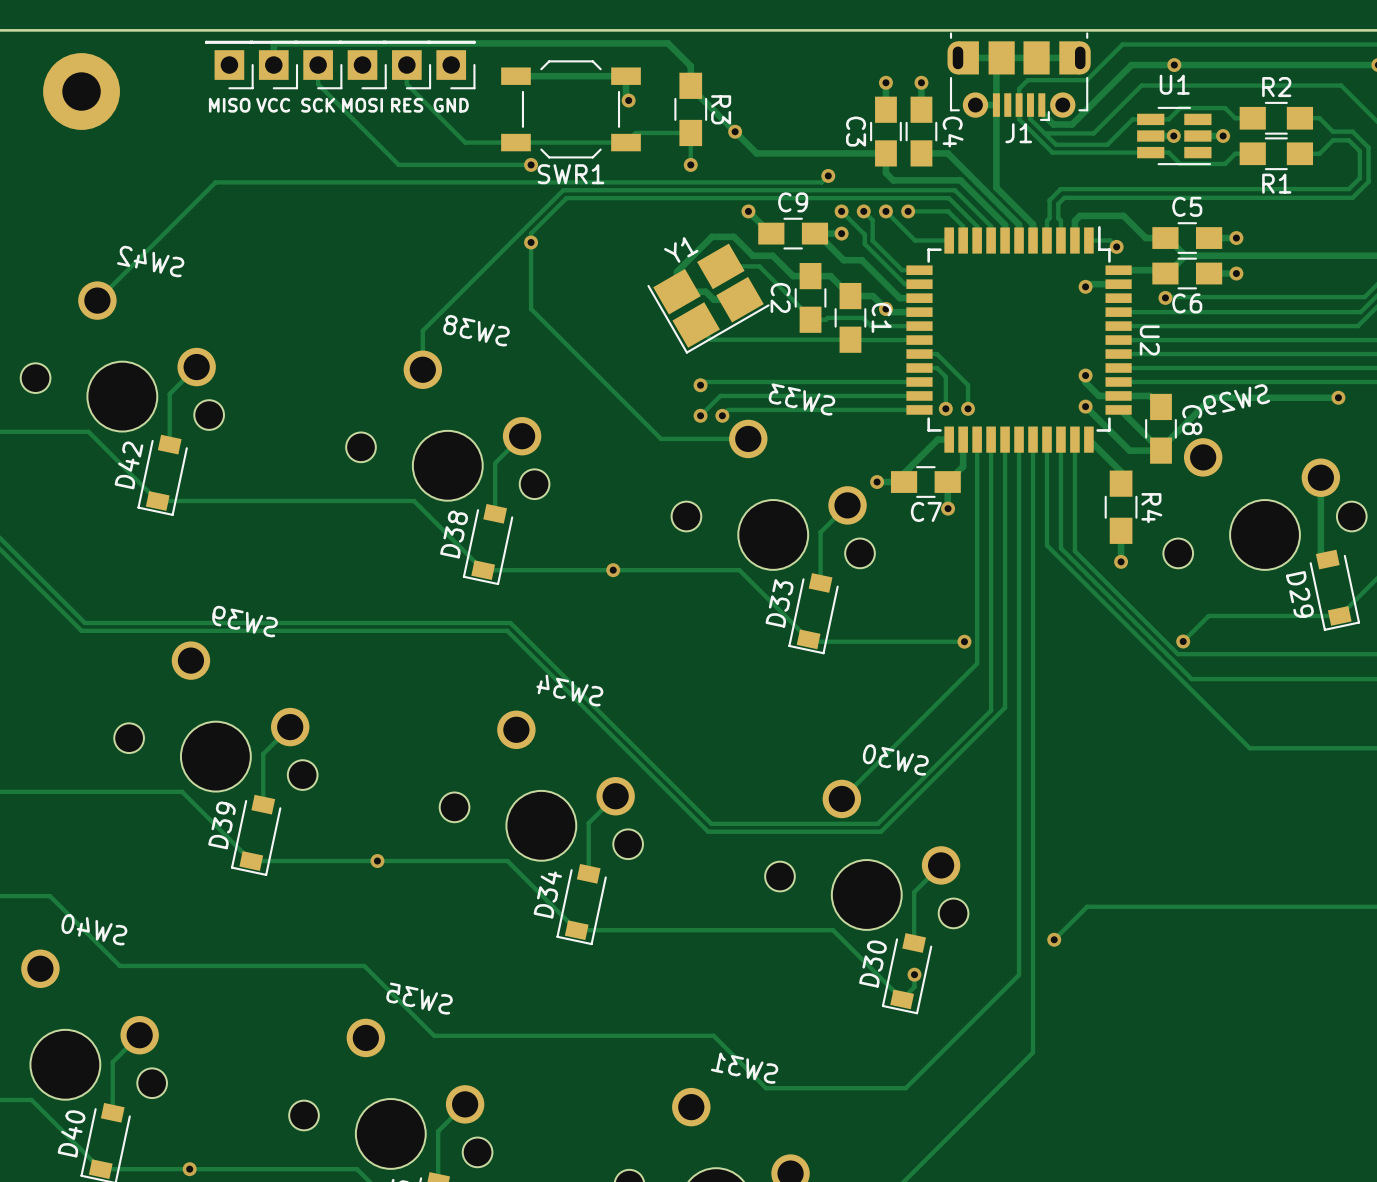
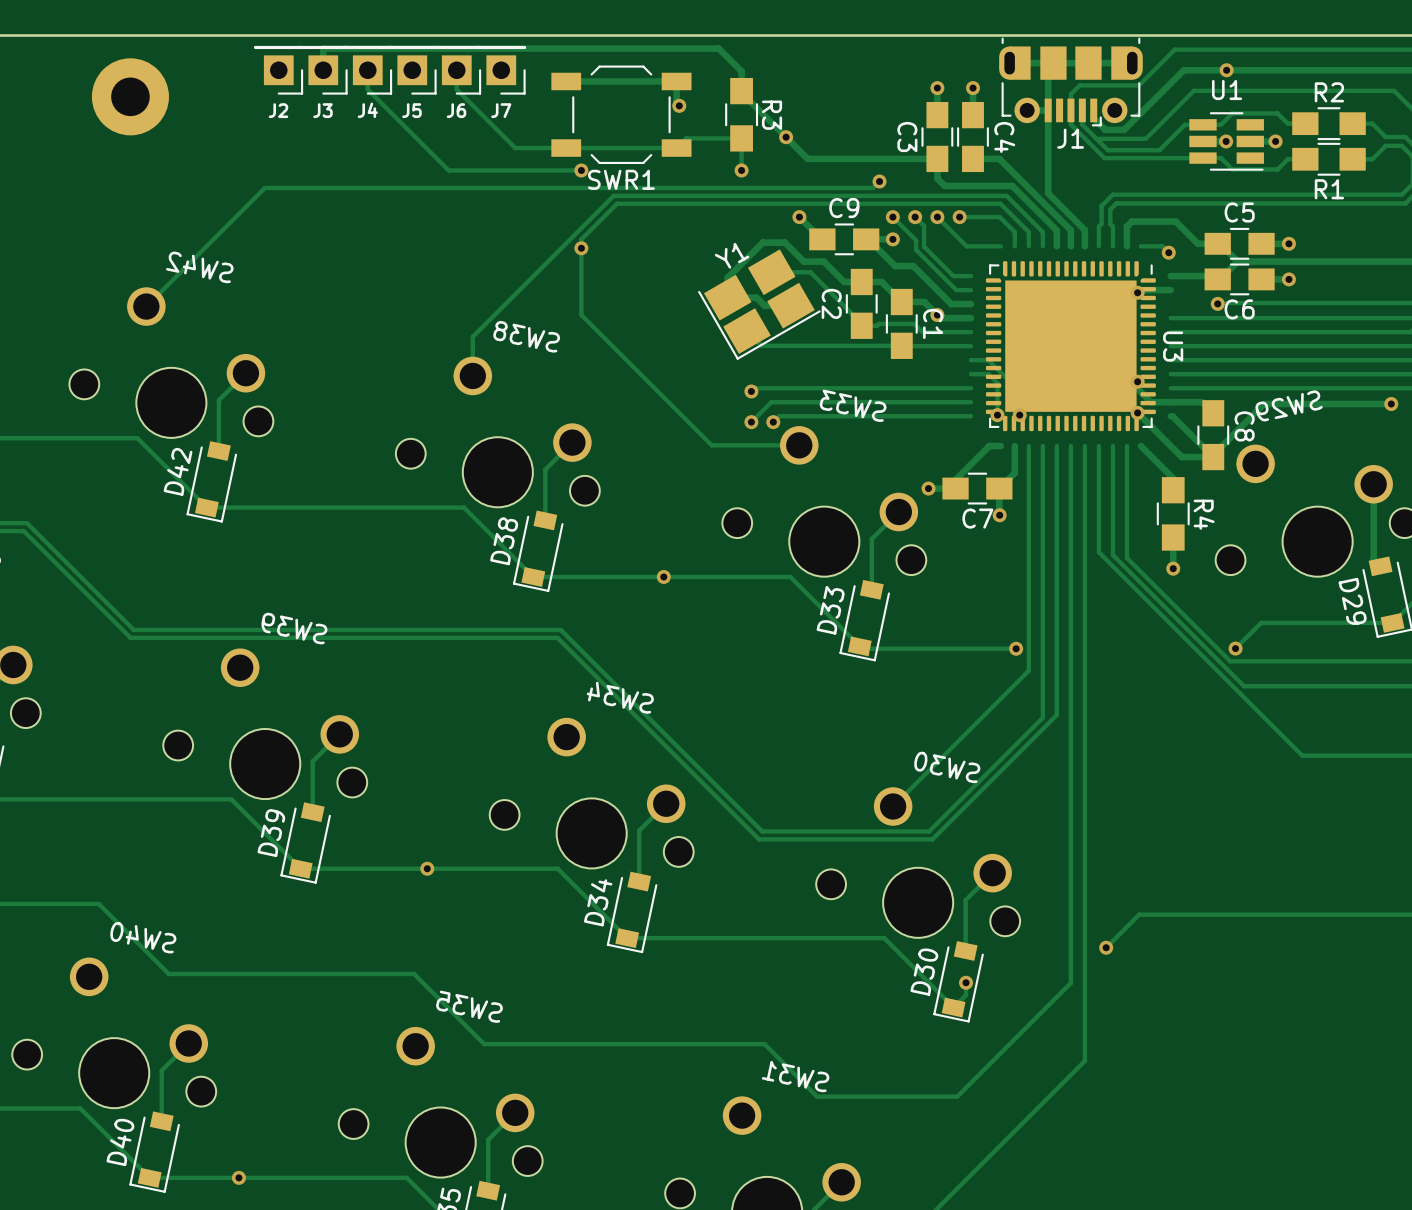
MISO name: MISO (229, 105) -> J2 (278, 110)
VCC name: VCC (273, 105) -> J3 (322, 110)
SCK name: SCK (318, 105) -> J4 (367, 110)
MOSI name: MOSI (362, 105) -> J5 (411, 110)
RES name: RES (407, 105) -> J6 (456, 110)
GND name: GND (451, 105) -> J7 (501, 110)
U2: (1019, 339) -> none
U3: none -> (1070, 346)

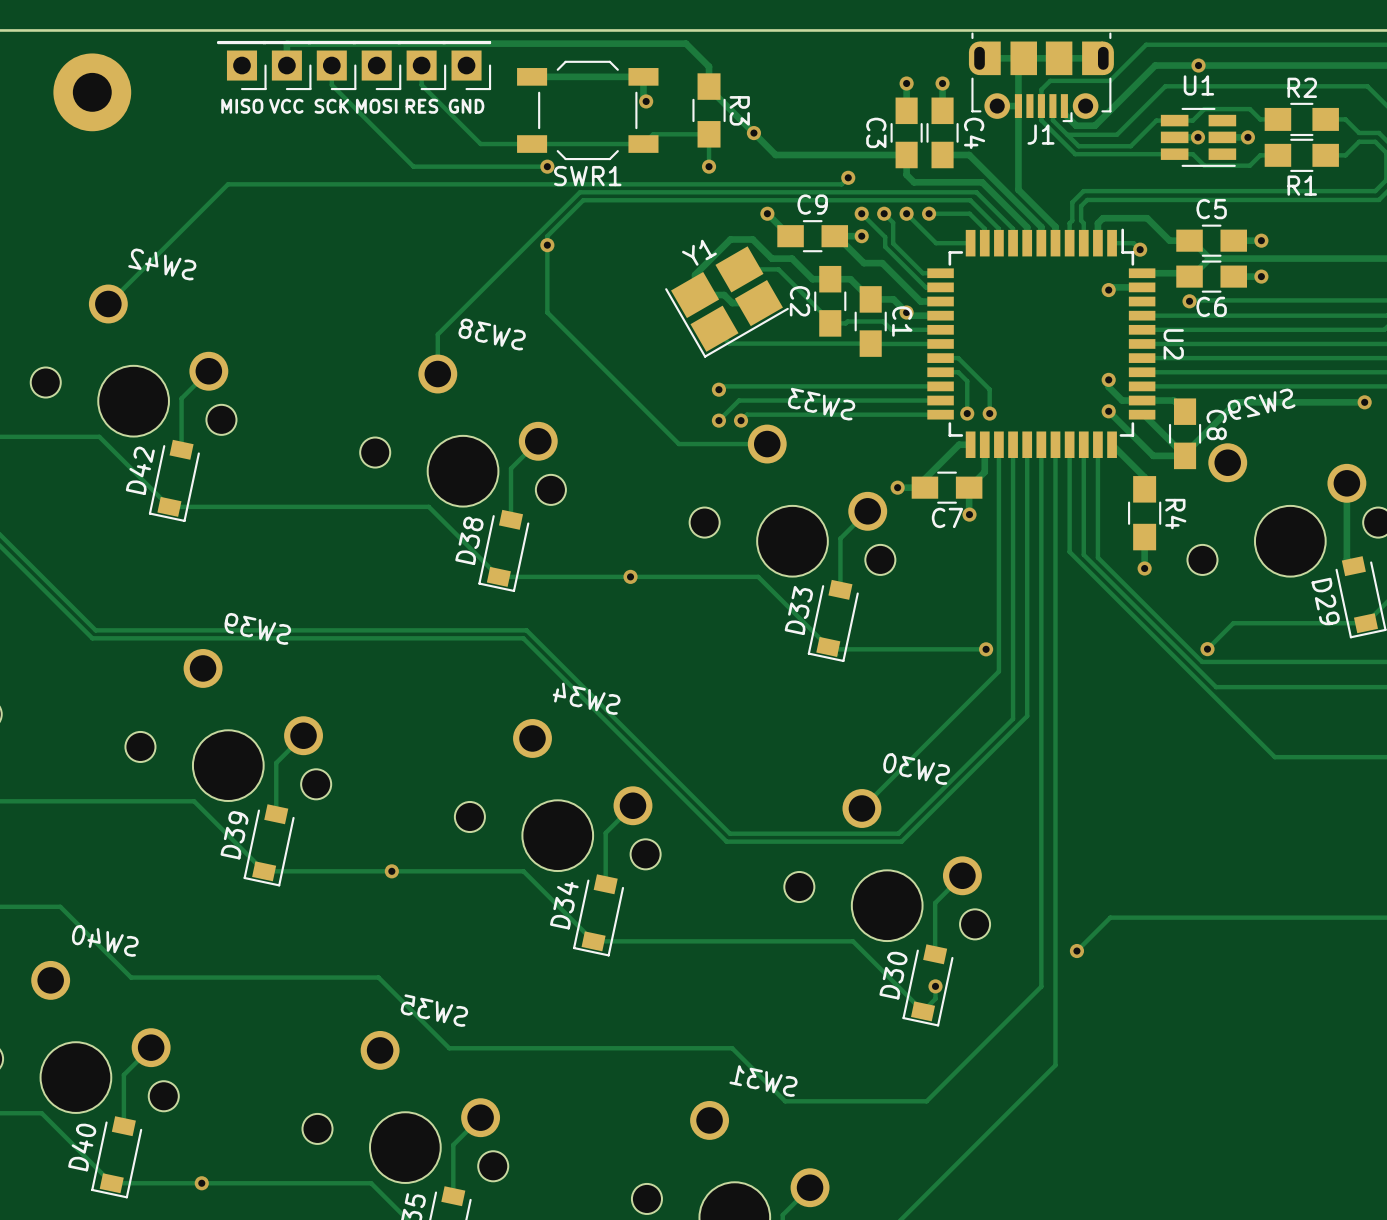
J2 name: J2 (278, 110) -> MISO (242, 106)
J3 name: J3 (322, 110) -> VCC (286, 106)
J4 name: J4 (367, 110) -> SCK (331, 106)
J5 name: J5 (411, 110) -> MOSI (376, 106)
J6 name: J6 (456, 110) -> RES (421, 106)
J7 name: J7 (501, 110) -> GND (466, 106)
U2: none -> (1041, 343)
U3: (1070, 346) -> none

